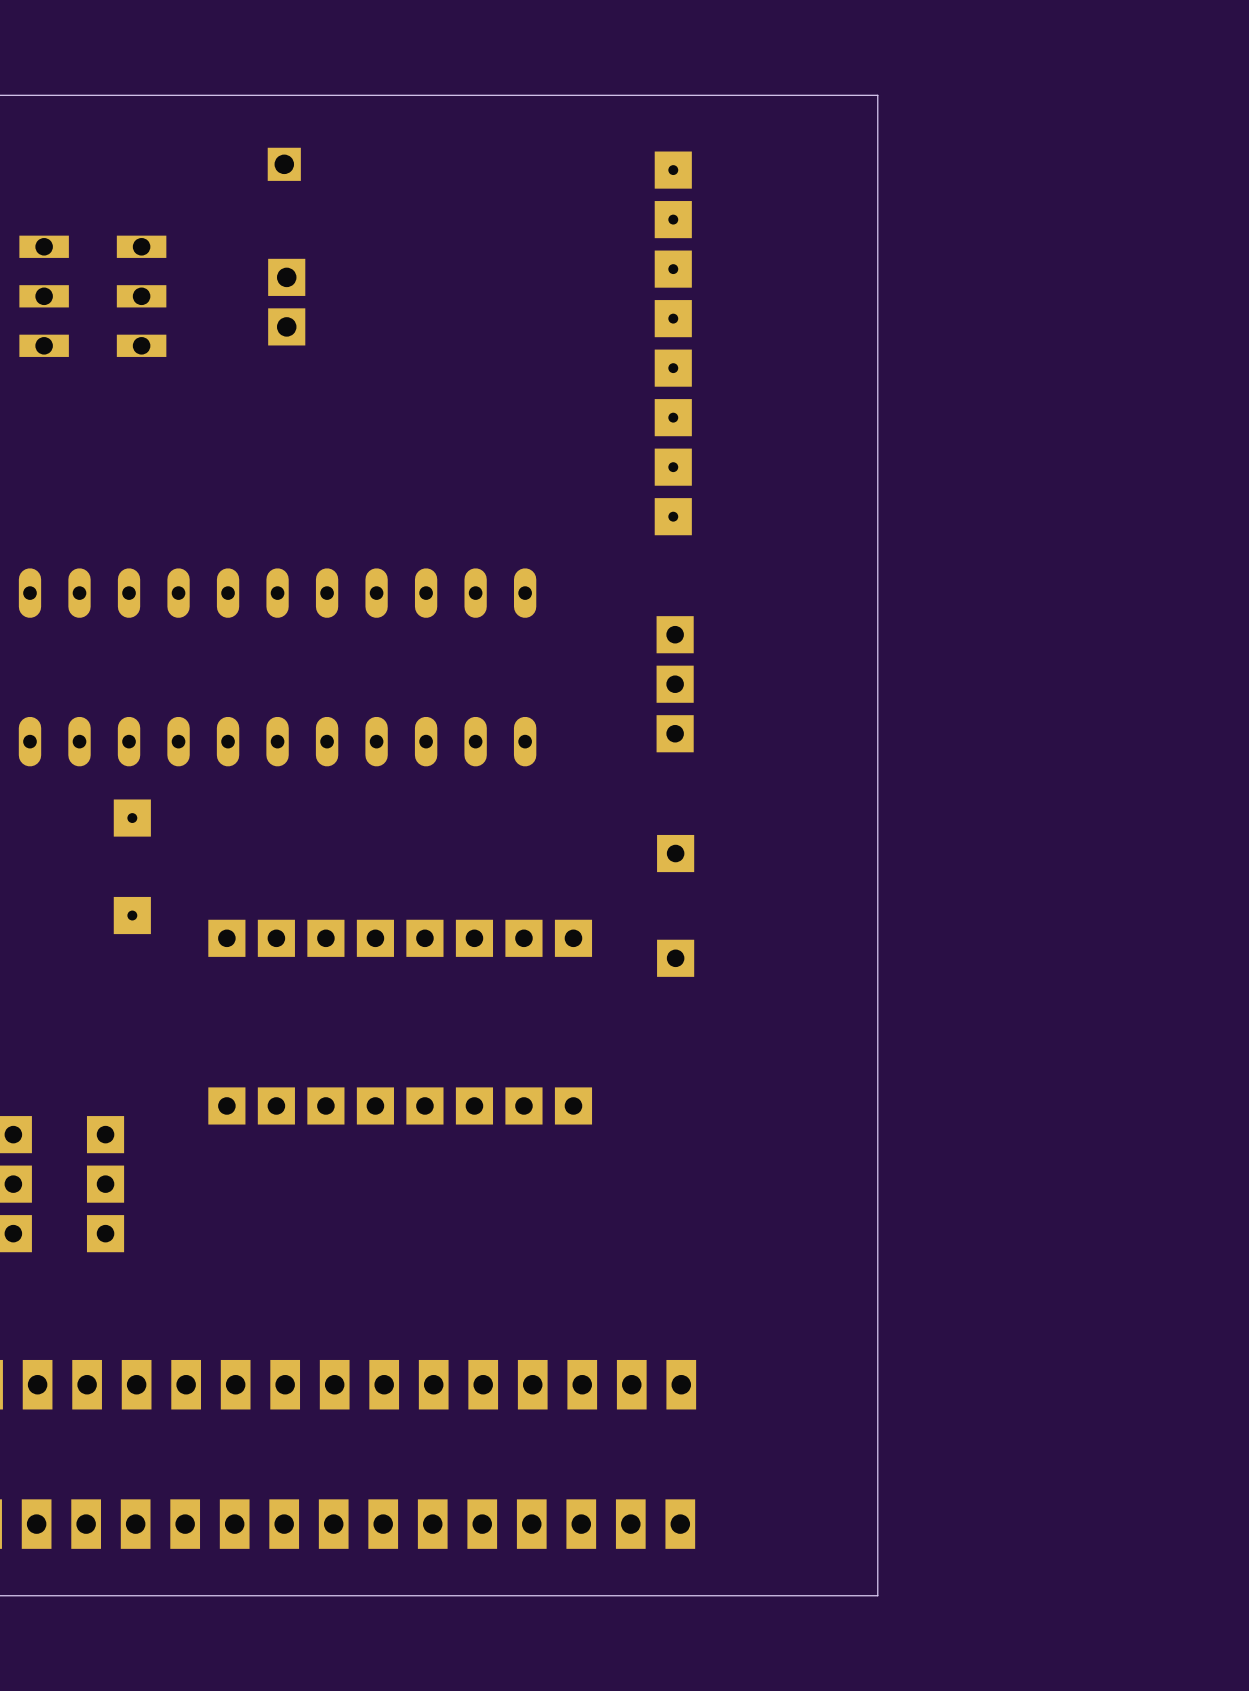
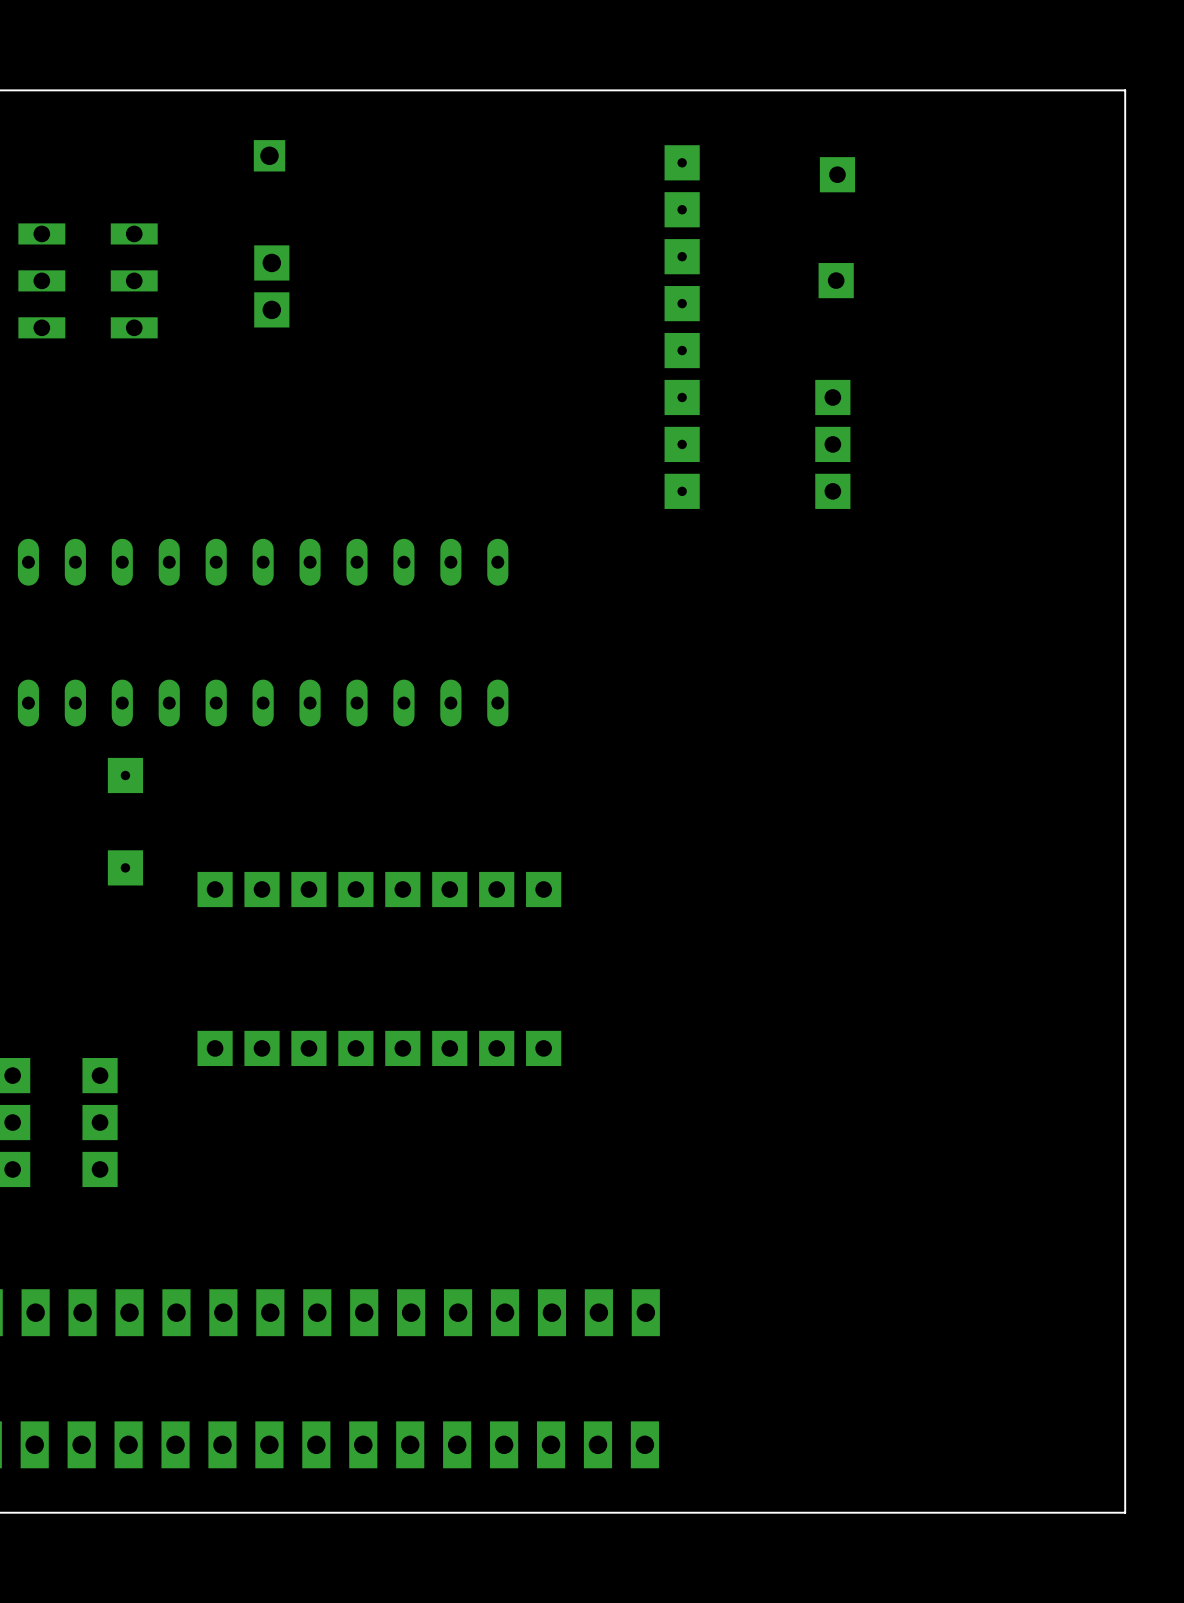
board edge: (877, 95) (877, 1595) -> (832, 90) (1125, 90) (1125, 1512) (832, 1512)
part: none -> (837, 174)
part: none -> (836, 280)
part position: (673, 343) -> (682, 327)
part position: (675, 684) -> (832, 444)
part: (675, 853) -> none
part: (675, 958) -> none

